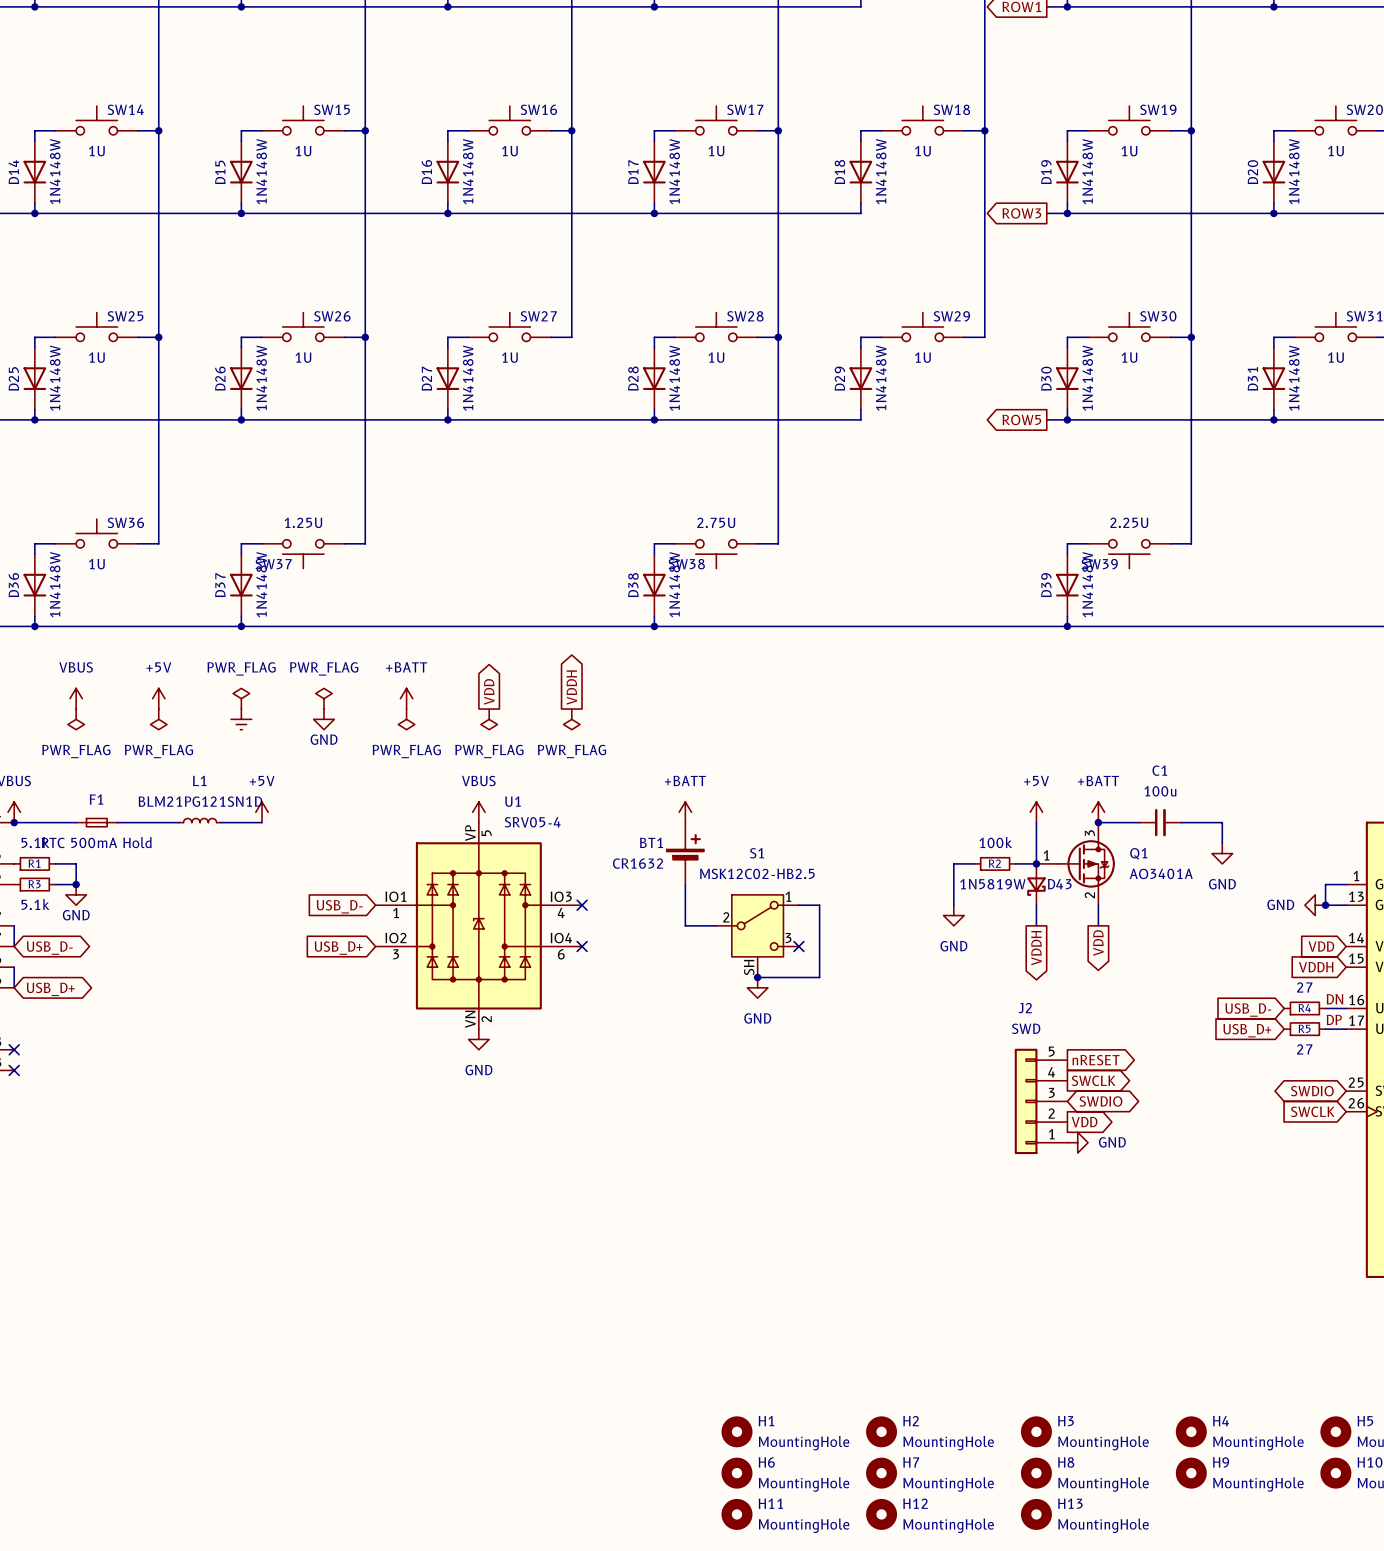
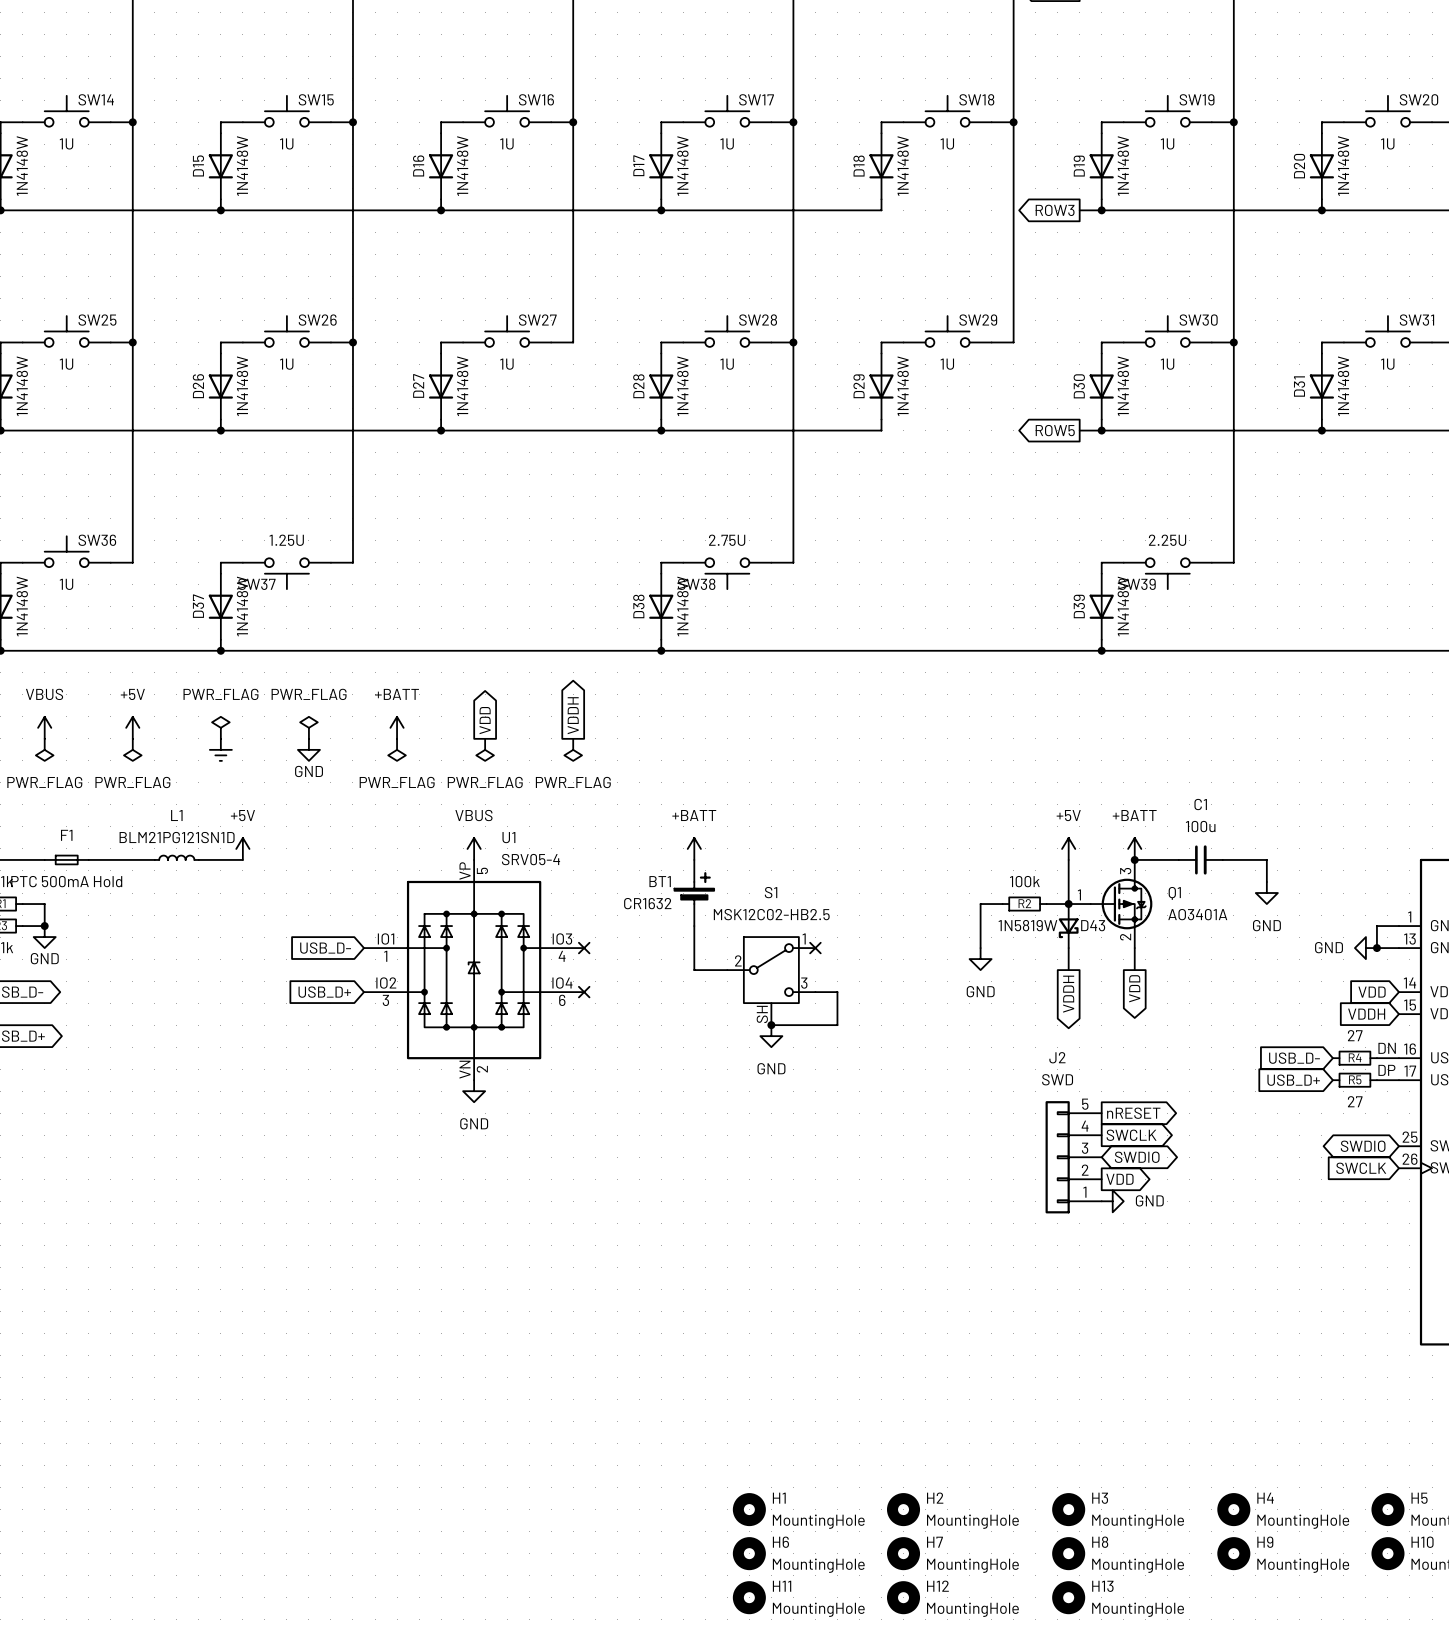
wire: (798, 905) (819, 905) (819, 946) -> (815, 992) (837, 992)
no-connect mark position: (798, 946) -> (815, 948)

